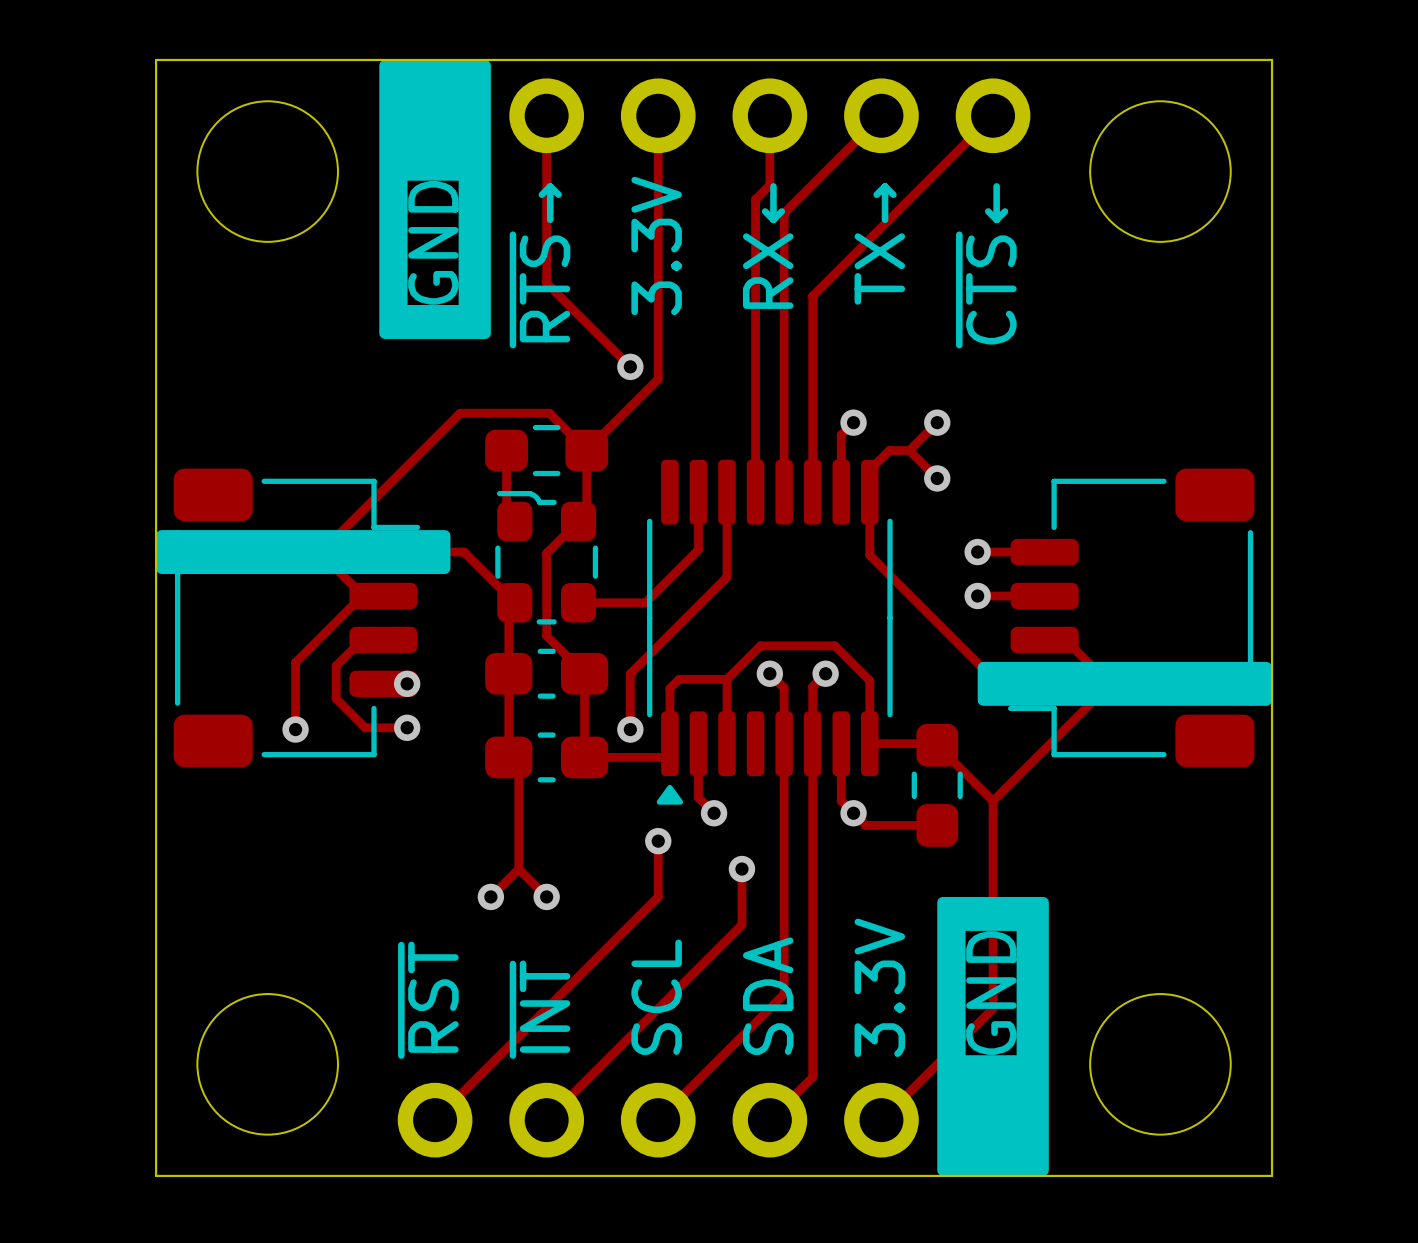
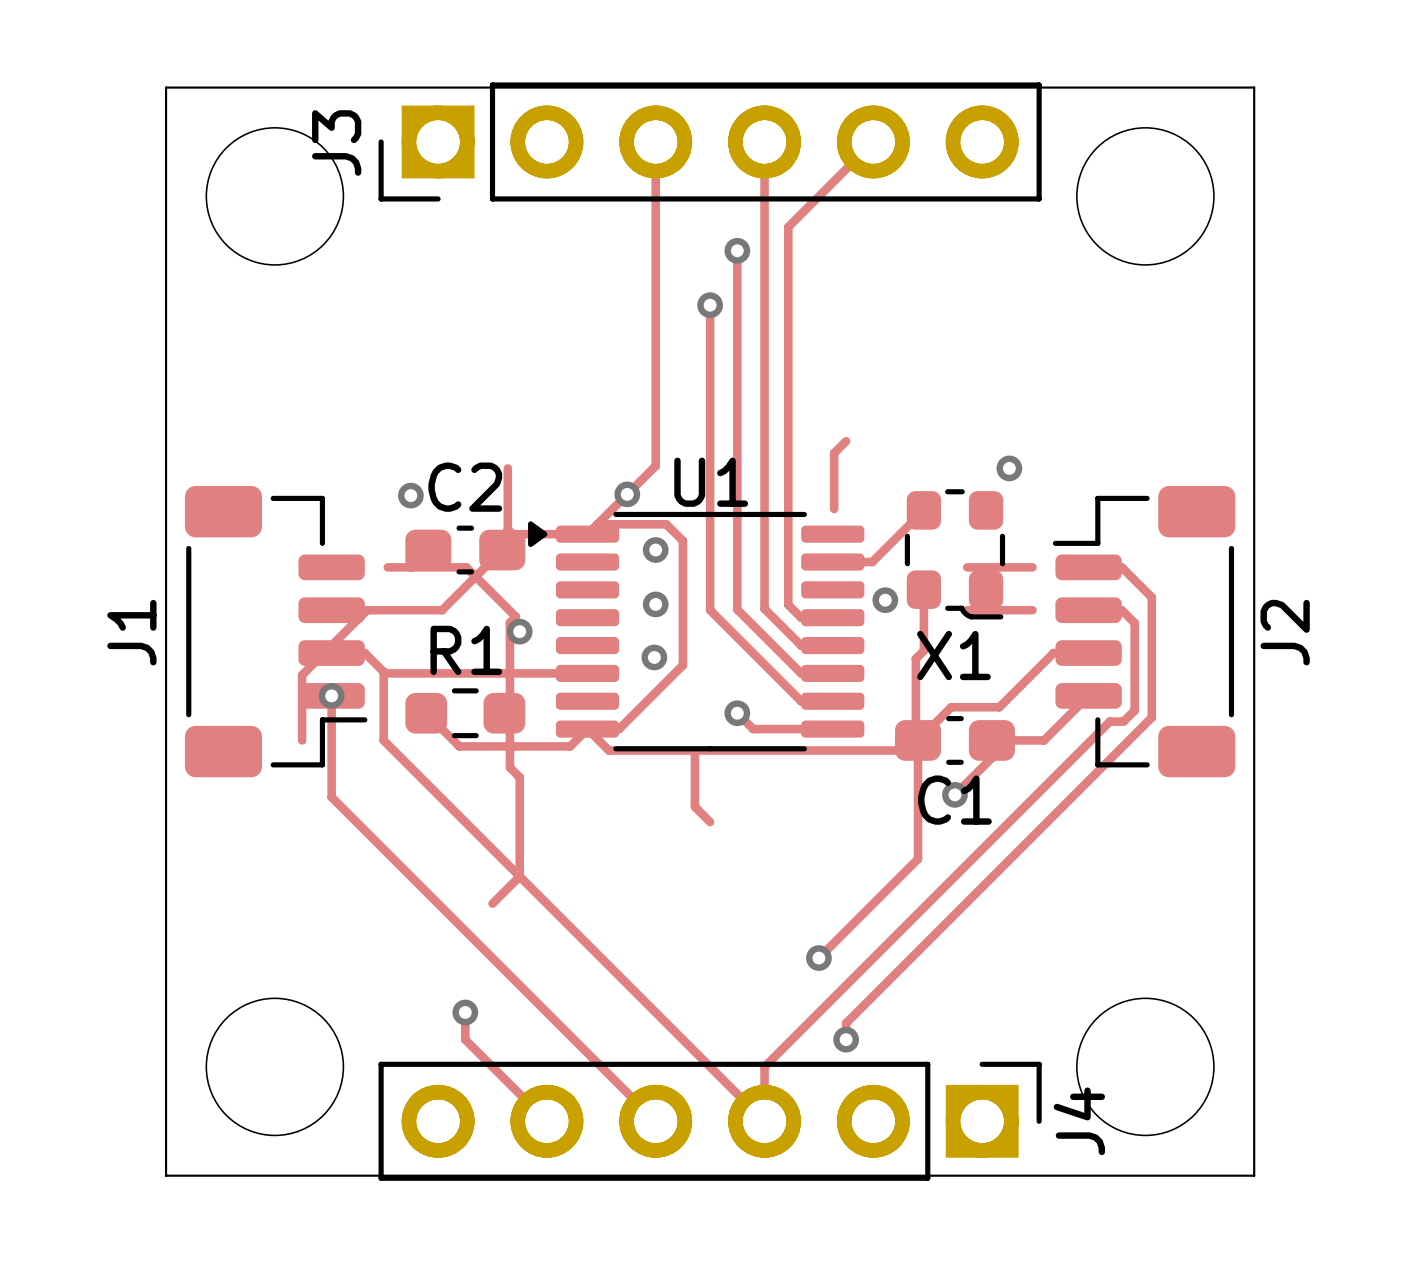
drawing: [379, 59, 491, 339] -> none
track: (546, 115) (546, 283) (630, 366) -> none
J3: none -> (710, 141)
track: (993, 115) (812, 296) (812, 492) -> none
track: (769, 185) (755, 199) (755, 492) -> (764, 209) (764, 608) (801, 645) (832, 645)
track: (794, 202) (784, 213) (784, 492) -> (788, 227) (788, 604) (801, 617) (832, 617)
track: none -> (737, 250) (737, 609) (801, 673) (832, 673)
via: none -> (737, 250)
text: GND (433, 242) -> none
text: TX→ (879, 243) -> none
text: 3.3V (656, 245) -> none
text: RX← (768, 245) -> none
text: ~{RTS}→ (539, 265) -> none
text: ~{CTS}← (986, 265) -> none
track: none -> (710, 305) (710, 610) (801, 701) (832, 701)
via: none -> (710, 305)
via: (630, 366) -> none
track: (658, 379) (586, 450) -> (655, 398) (655, 465) (587, 534) (518, 534) (442, 610) (387, 610)
via: (853, 422) -> none
track: (937, 422) (909, 450) -> none
via: (937, 422) -> none
part: (546, 450) -> none
track: (586, 450) (586, 513) (546, 553) (546, 635) (584, 673) (584, 757) (669, 757) (669, 688) (679, 679) (727, 679) -> none
track: (586, 450) (549, 413) (460, 413) (336, 537) (336, 568) (363, 595) -> none
track: (909, 450) (889, 450) (869, 470) (869, 555) (998, 683) (1044, 683) -> none
track: (909, 450) (937, 478) -> none
via: none -> (1009, 468)
via: none -> (627, 494)
via: none -> (410, 495)
via: (937, 478) -> none
track: (698, 492) (698, 549) (645, 602) (578, 602) -> none
track: (727, 492) (727, 577) (630, 673) (630, 729) -> none
track: none -> (923, 510) (872, 562) (832, 562)
track: none -> (597, 524) (666, 524) (682, 540) (682, 665) (619, 729) (587, 729)
drawing: [156, 530, 451, 575] -> none
C2: none -> (465, 550)
via: none -> (655, 550)
X1: none -> (954, 554)
via: (977, 552) -> none
track: none -> (1088, 567) (1121, 567) (1151, 597) (1151, 717) (846, 1023) (846, 1039)
part: (546, 557) -> none
track: none -> (923, 589) (923, 650) (915, 658) (918, 859) (818, 958)
via: none -> (885, 600)
via: none -> (655, 604)
via: (977, 595) -> none
track: none -> (1088, 610) (1121, 610) (1134, 623) (1134, 710) (1123, 721) (1109, 721) (764, 1066) (764, 1121) (546, 903)
J1: none -> (276, 631)
part: (296, 617) -> none
via: none -> (519, 631)
U1: none -> (696, 631)
part: (1131, 617) -> none
J2: none -> (1144, 631)
part: (769, 632) -> none
track: none -> (331, 653) (364, 653) (385, 673) (587, 673)
track: (383, 639) (362, 639) (336, 665) (336, 698) (365, 727) (407, 727) -> none
track: (1044, 639) (1065, 639) (1091, 666) (1091, 702) (993, 801) -> none
track: none -> (1088, 653) (1053, 653) (999, 707) (951, 707) (907, 750) (608, 750) (587, 729)
via: none -> (654, 657)
track: none -> (383, 671) (383, 740) (519, 876)
drawing: [977, 661, 1273, 706] -> none
part: (546, 673) -> none
track: (769, 673) (784, 688) (784, 994) (658, 1120) -> (331, 695) (331, 797) (655, 1121)
via position: (769, 673) -> (737, 713)
track: (825, 673) (812, 686) (812, 1077) (769, 1120) -> none
via: (825, 673) -> none
track: (727, 679) (760, 645) (835, 645) (869, 680) (869, 743) (935, 743) (993, 801) -> none
track: (727, 679) (727, 743) -> none
via: none -> (331, 695)
via: (407, 683) -> none
track: none -> (1088, 695) (1044, 740) (991, 740) (991, 757) (954, 794)
track: none -> (426, 713) (459, 746) (570, 746) (587, 729)
R1: none -> (465, 713)
track: none -> (737, 713) (753, 729) (832, 729)
via: (407, 727) -> none
via: (295, 729) -> none
via: (630, 729) -> none
C1: none -> (954, 740)
track: (841, 743) (841, 800) (865, 825) (937, 825) -> none
part: (546, 757) -> none
part: (937, 785) -> none
via: none -> (954, 794)
track: (993, 801) (993, 1008) (881, 1120) -> none
via: (714, 813) -> none
via: (853, 813) -> none
track: (658, 841) (658, 896) (435, 1120) -> none
via: (658, 841) -> none
track: (741, 869) (741, 924) (546, 1120) -> (465, 1012) (465, 1039) (546, 1121)
via: (741, 869) -> none
via: (490, 896) -> none
via: (546, 896) -> none
drawing: [937, 896, 1049, 1176] -> none
via: none -> (818, 958)
text: 3.3V (879, 987) -> none
text: GND (991, 993) -> none
text: SDA (768, 996) -> none
text: SCL (656, 997) -> none
text: ~{RST} (428, 1000) -> none
via: none -> (465, 1012)
text: ~{INT} (539, 1009) -> none
via: none -> (846, 1039)
J4: none -> (710, 1121)

